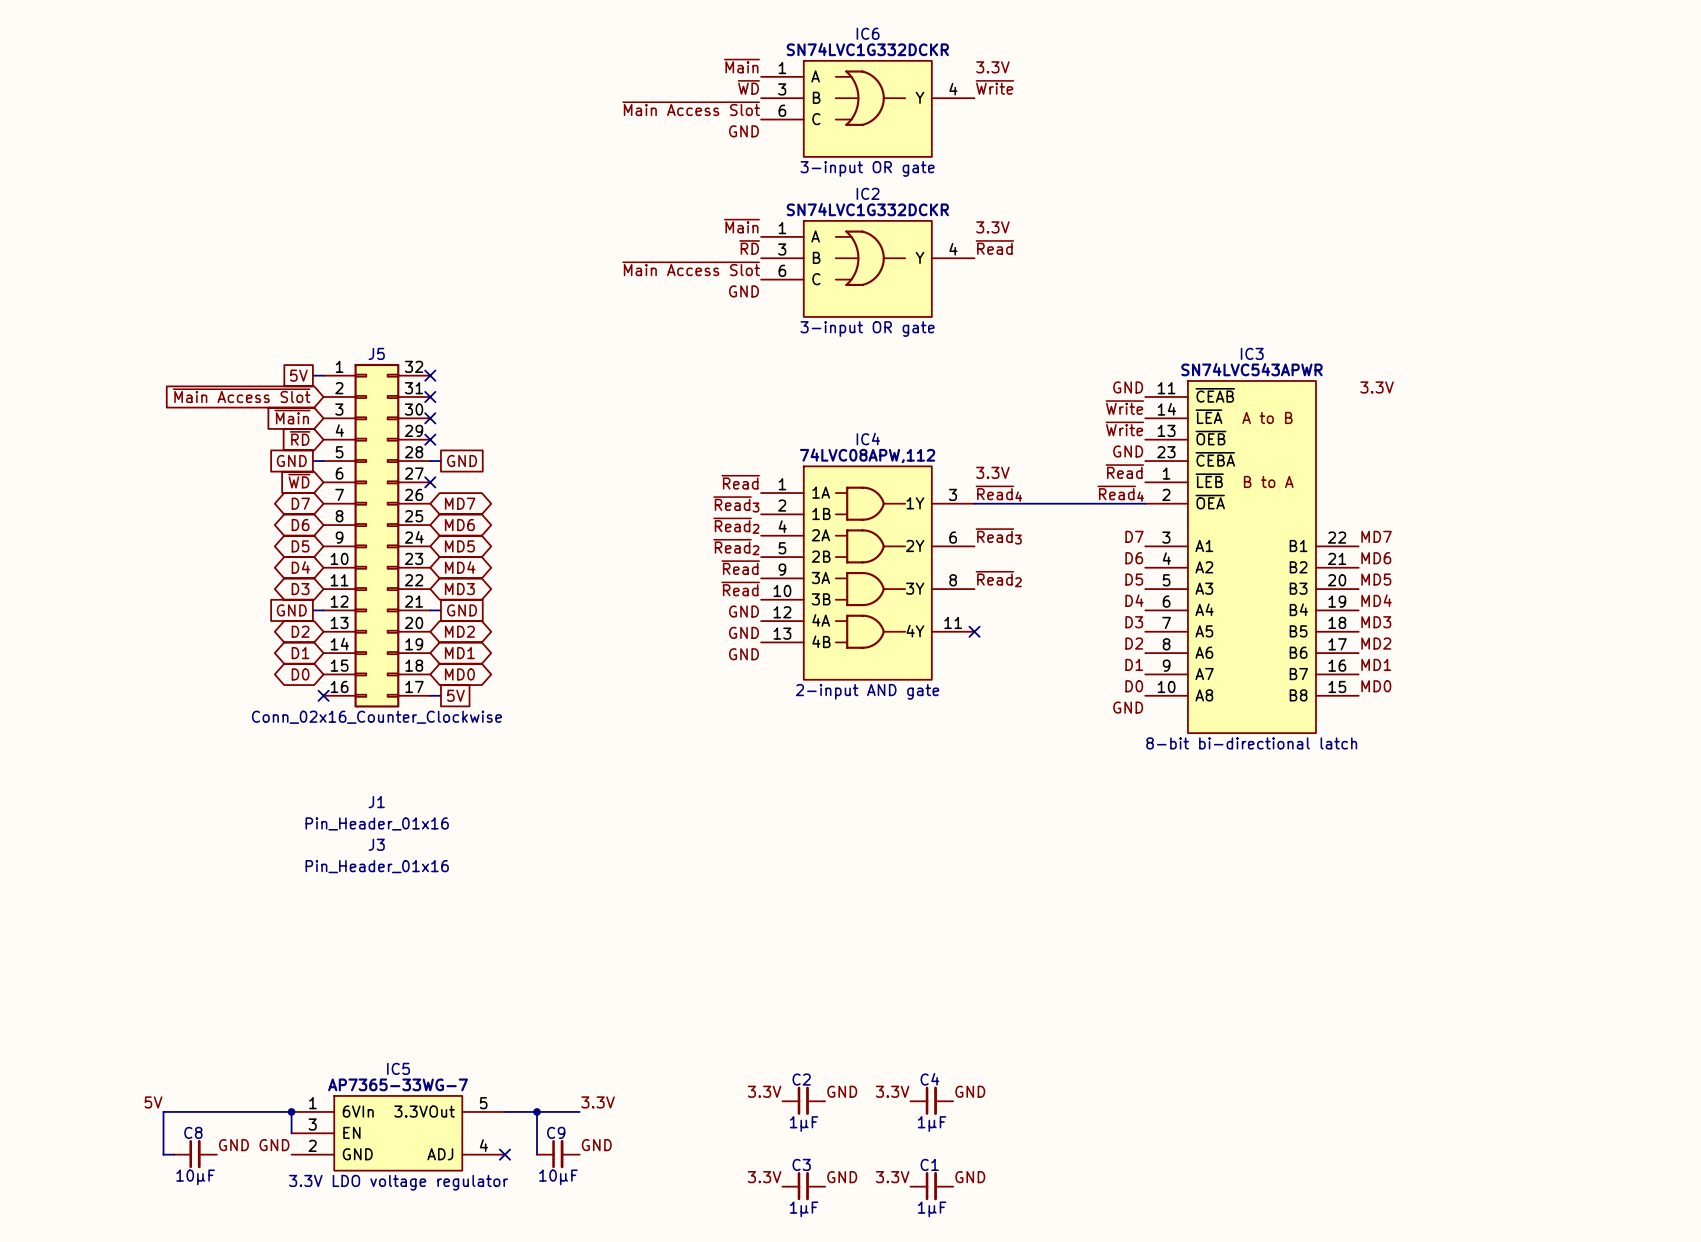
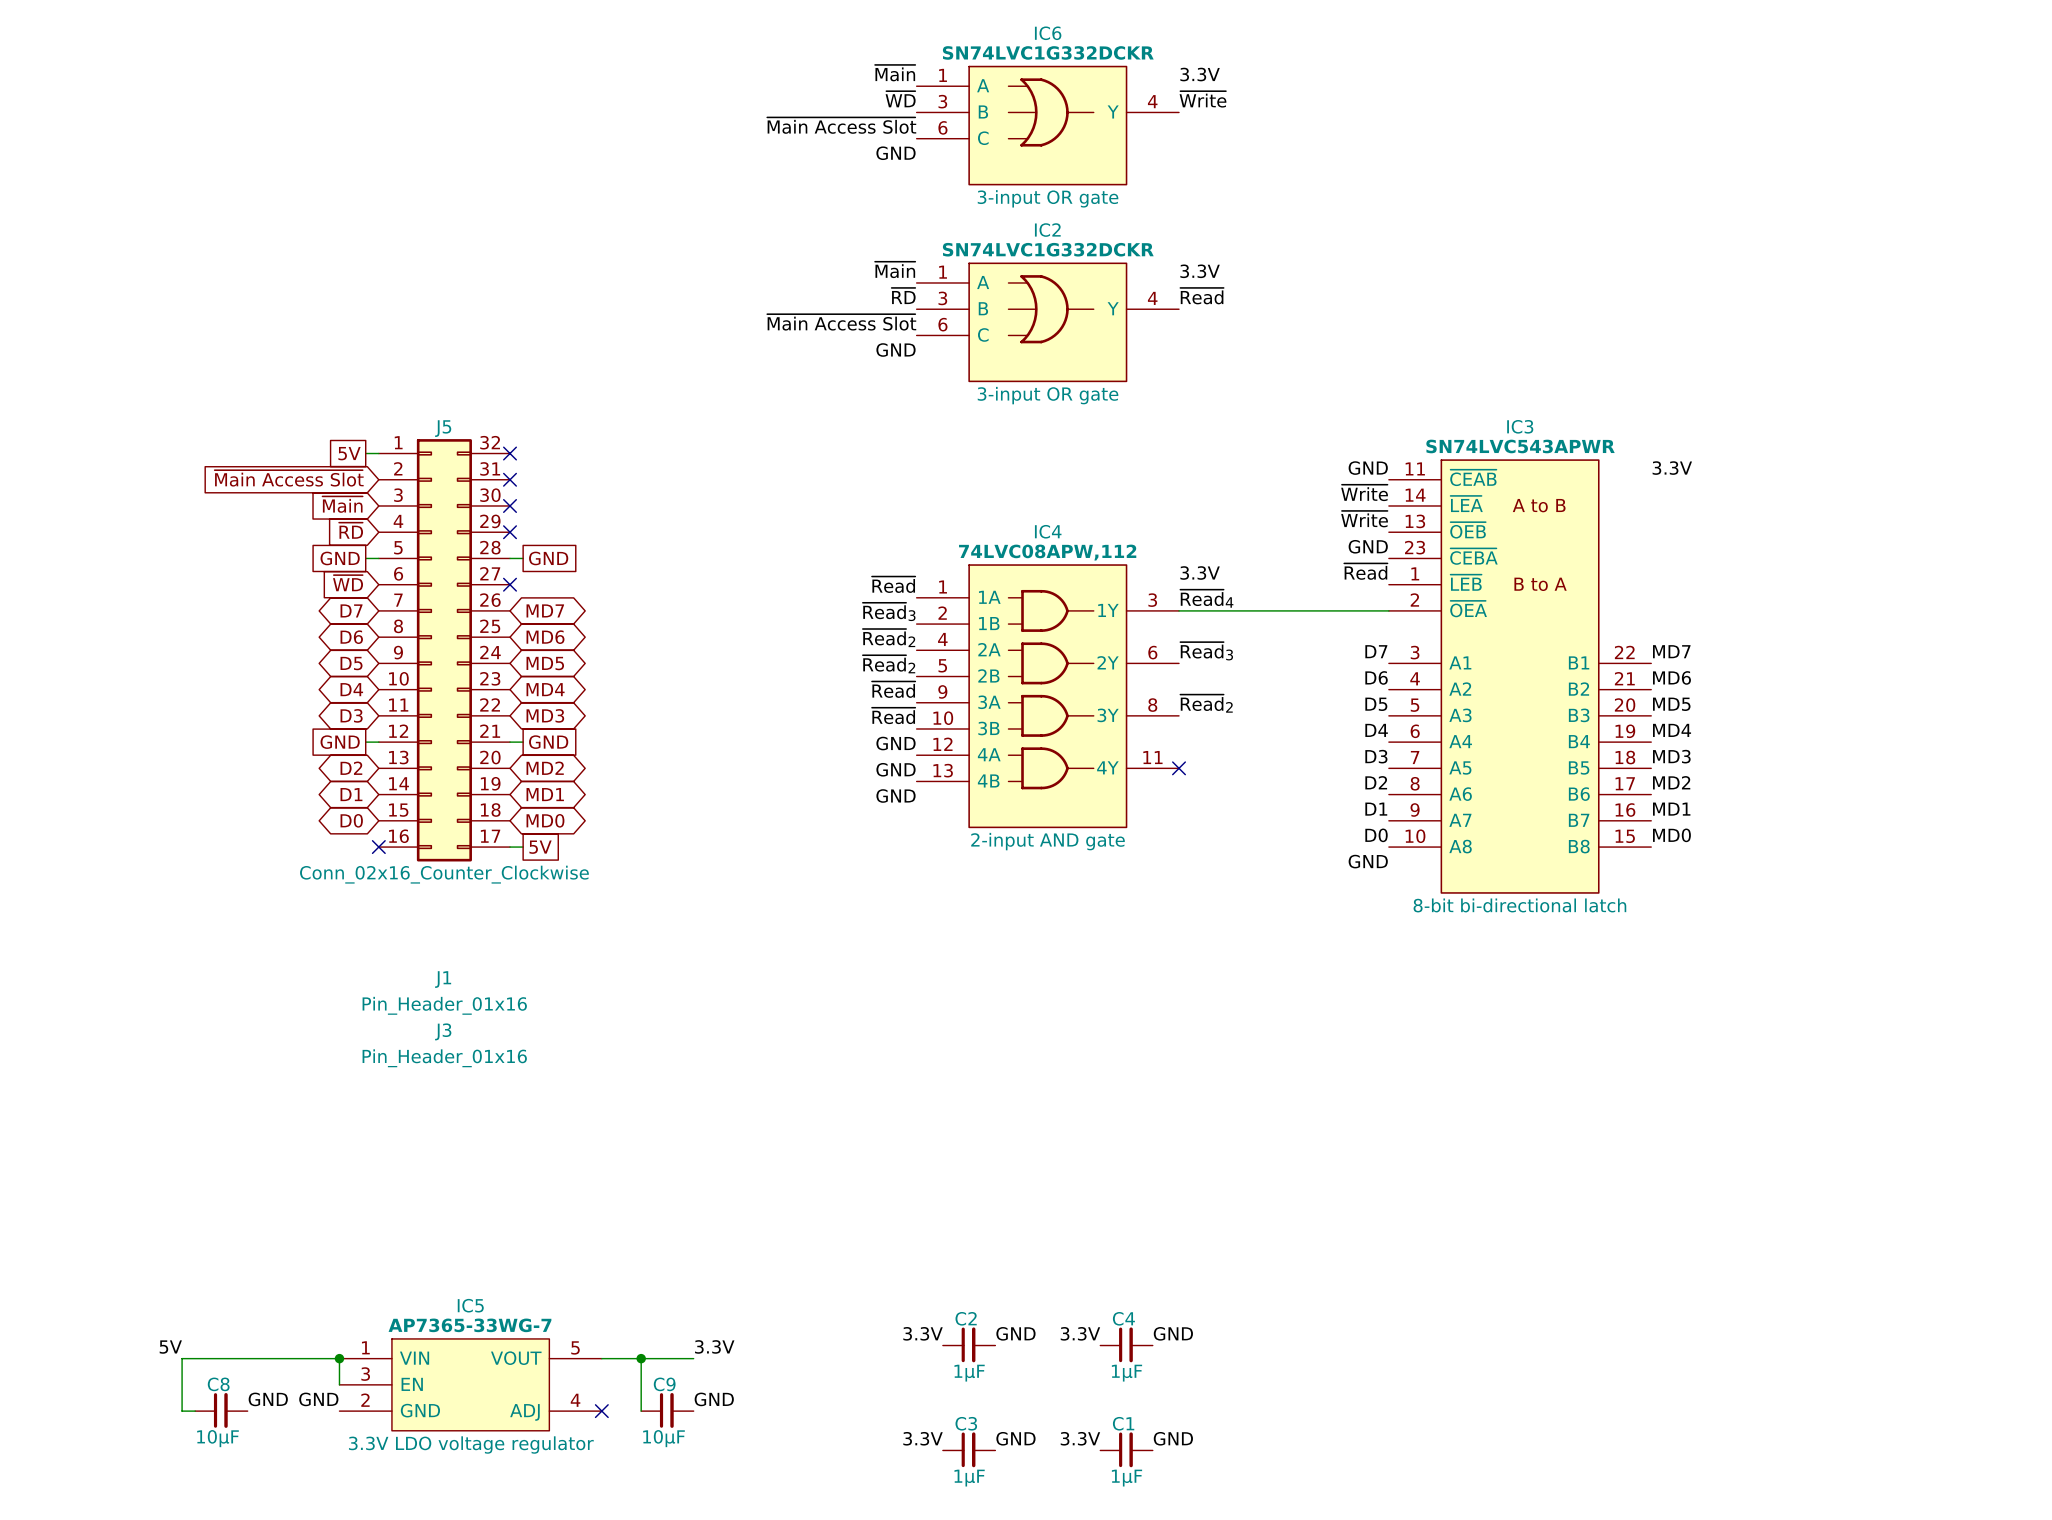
label: ~{Read}4 (1120, 493) -> none
IC5 pin name: 6VIn (358, 1111) -> VIN (414, 1358)
IC5 pin name: 3.3VOut (424, 1111) -> VOUT (516, 1358)

